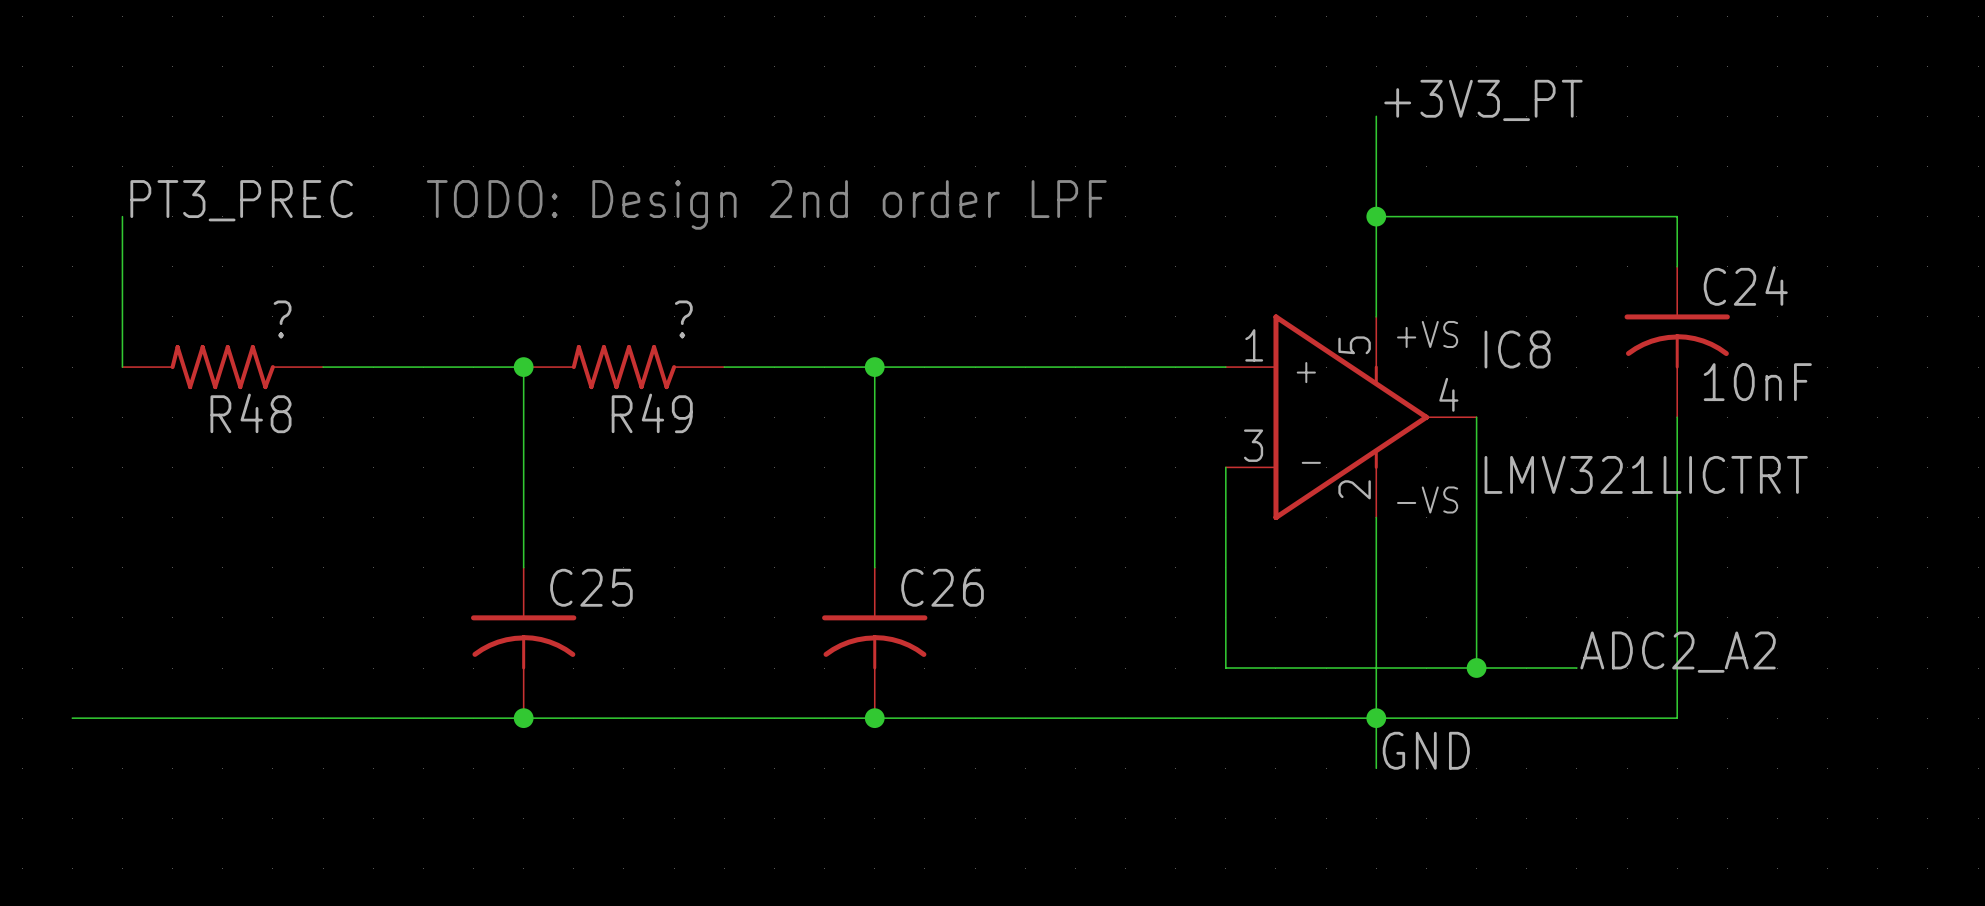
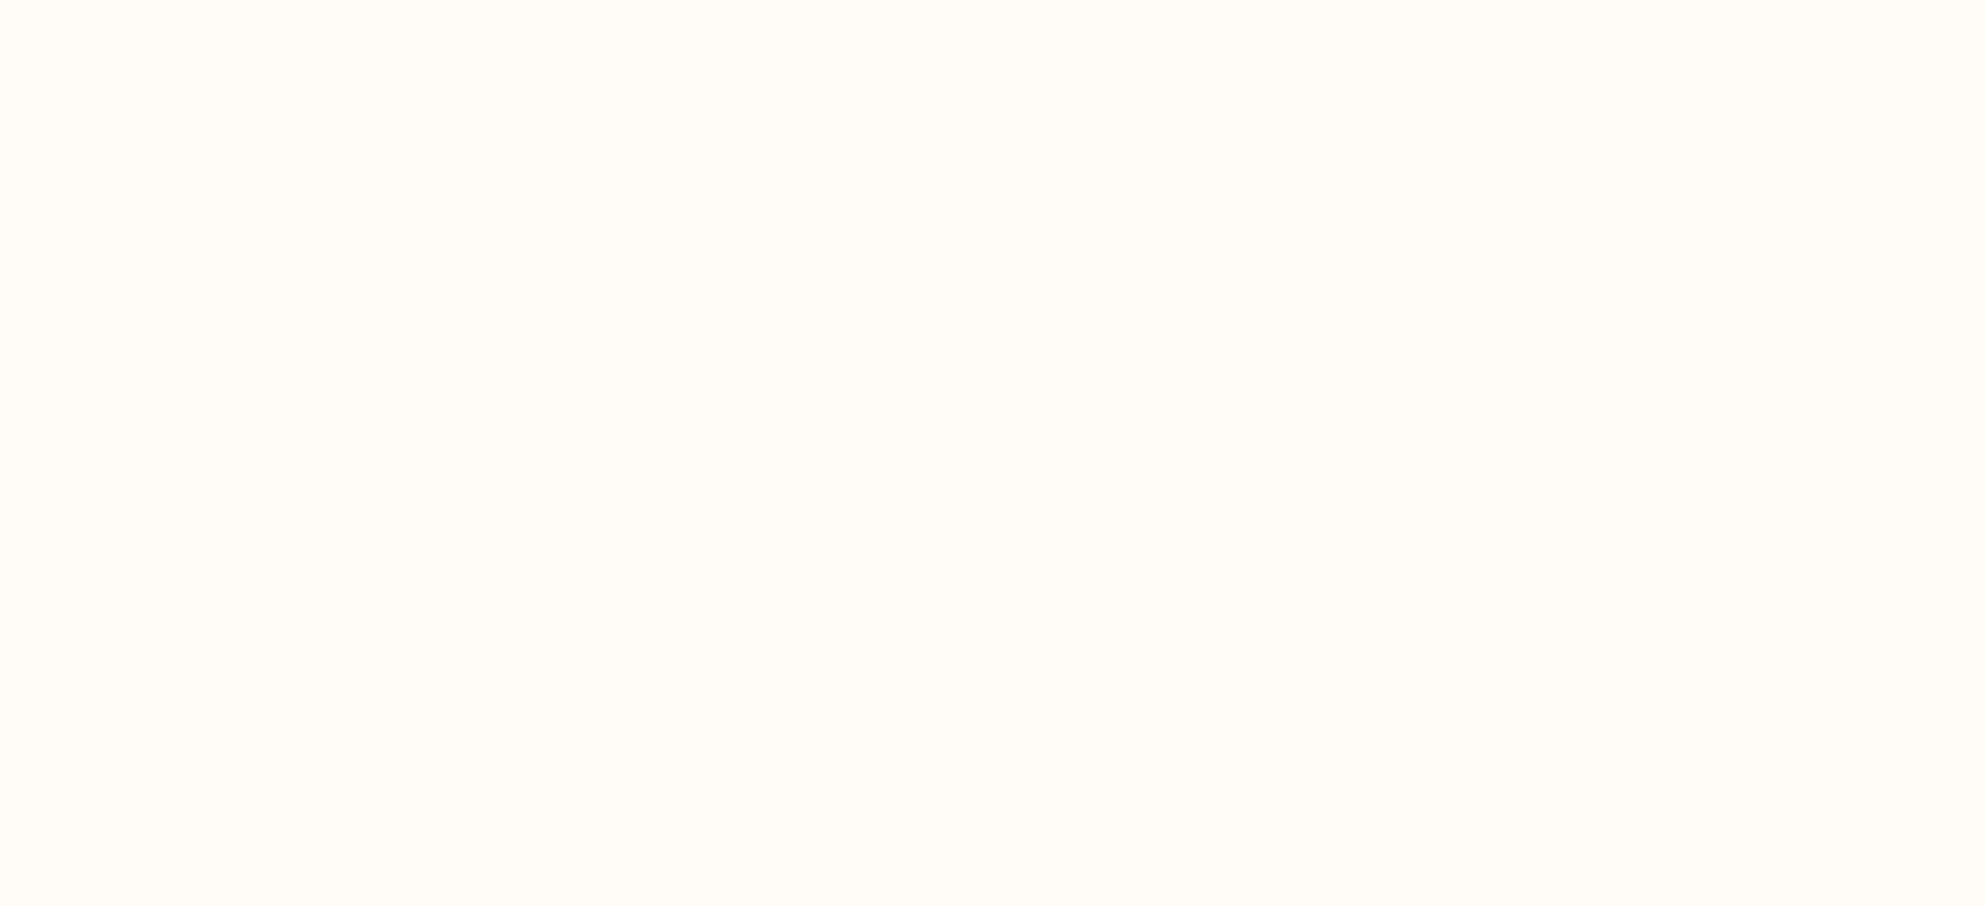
label: +3V3_PT (1483, 100) -> none
wire: (1376, 116) (1376, 316) -> none
label: PT3_PREC (241, 200) -> none
text: TODO: Design 2nd order LPF (766, 204) -> none
wire: (122, 216) (122, 367) -> none
wire: (1376, 216) (1677, 216) (1677, 266) -> none
junction: (1376, 216) -> none
C24: 10nF (1677, 342) -> none
R48: ? (222, 367) -> none
wire: (323, 367) (523, 367) (523, 567) -> none
junction: (523, 367) -> none
R49: ? (623, 367) -> none
wire: (724, 367) (1225, 367) -> none
wire: (874, 367) (874, 567) -> none
junction: (874, 367) -> none
IC8: LMV321LICTRT (1351, 417) -> none
wire: (1476, 417) (1476, 668) -> none
wire: (1677, 417) (1677, 718) (72, 718) -> none
wire: (1225, 467) (1225, 668) (1576, 668) -> none
wire: (1376, 517) (1376, 768) -> none
C25: (523, 642) -> none
C26: (874, 642) -> none
label: ADC2_A2 (1678, 652) -> none
junction: (1476, 668) -> none
junction: (523, 718) -> none
junction: (874, 718) -> none
junction: (1376, 718) -> none
label: GND (1426, 750) -> none

